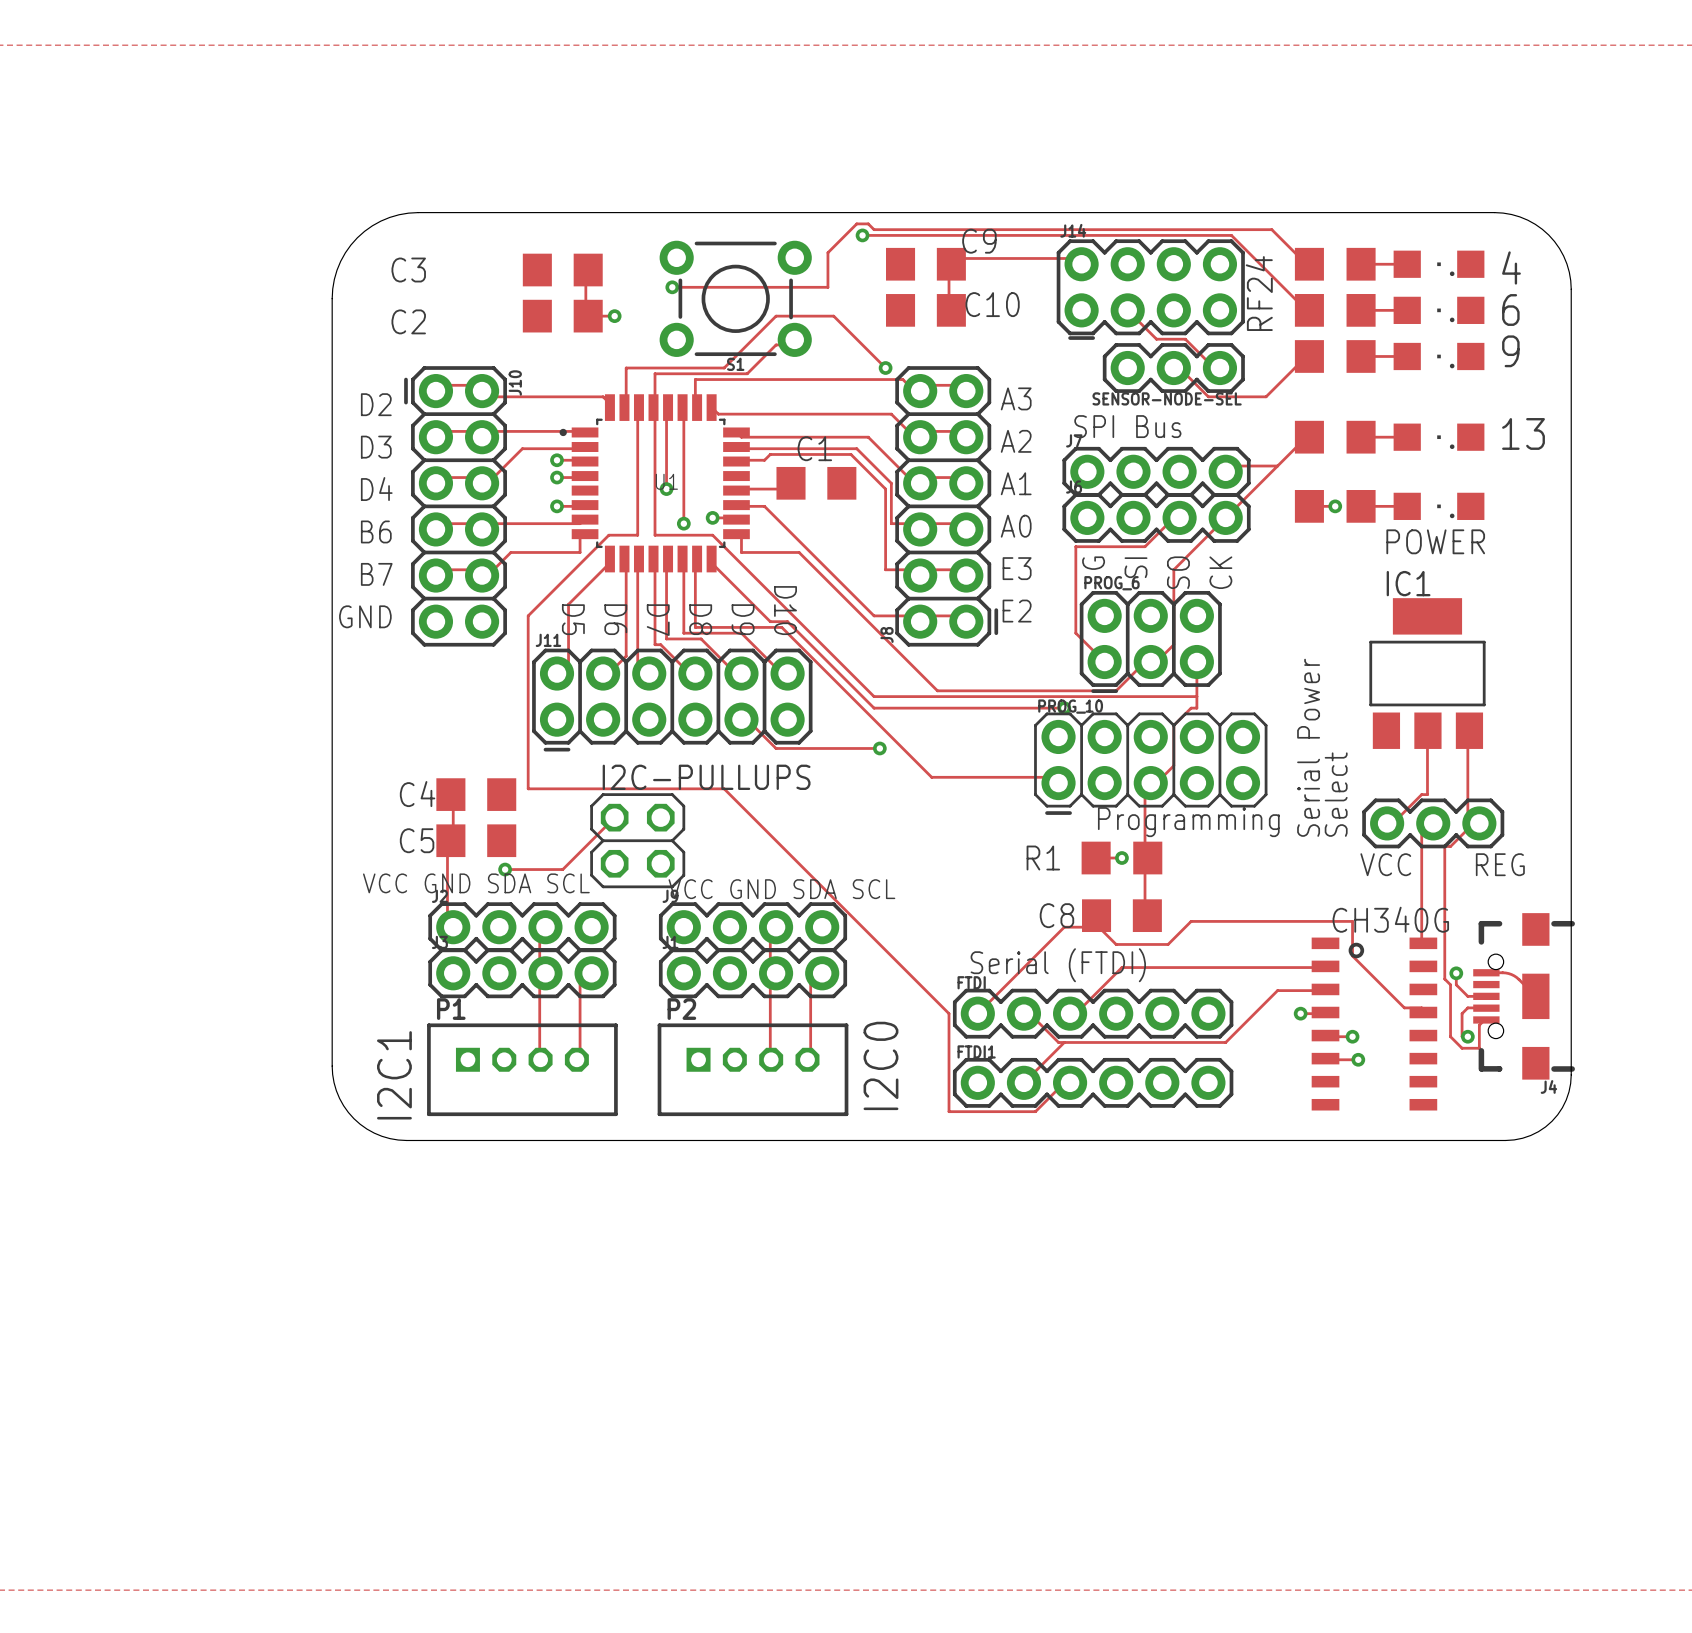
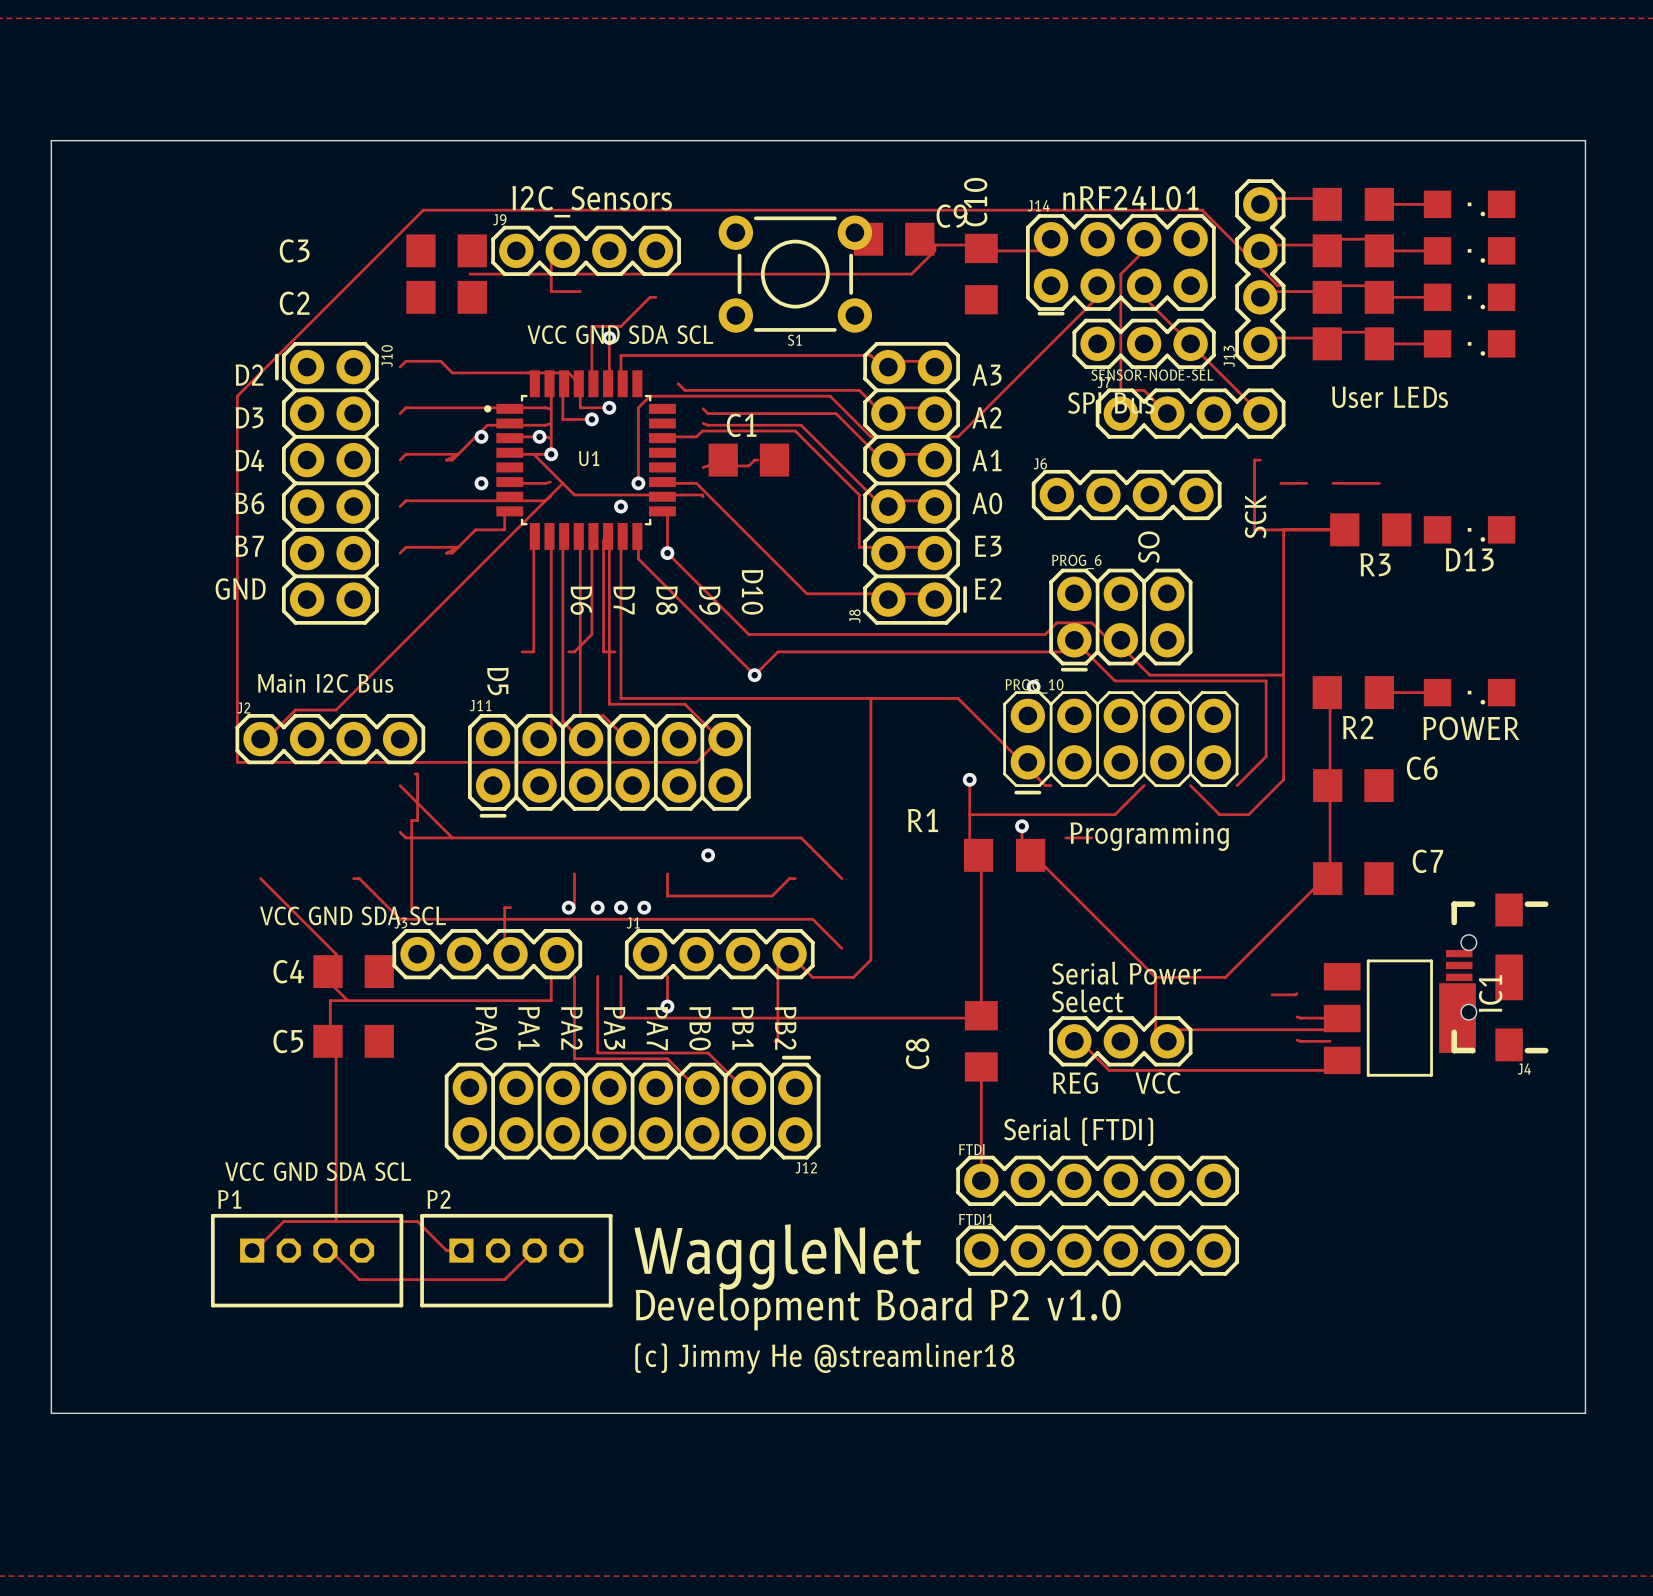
board edge: (418, 212) (1494, 212) (1519, 216) (1542, 229) (1554, 241) (1563, 256) (1569, 272) (1571, 289) (1571, 1074) (1569, 1091) (1557, 1114) (1538, 1131) (1522, 1138) (1505, 1140) (406, 1140) (381, 1136) (360, 1124) (348, 1112) (339, 1098) (334, 1082) (332, 1066) (332, 288) (337, 270) (345, 252) (364, 231) (389, 217) (418, 212) -> (51, 140) (51, 1413) (1585, 1413) (1585, 140) (51, 140)
text: none -> nRF24L01 (1130, 198)
text: none -> I2C_Sensors (592, 201)
track: none -> (1260, 204) (1266, 198) (1318, 198) (1324, 204) (1327, 204)
part: none -> (1353, 204)
track: none -> (1379, 204) (1437, 204)
part: none -> (1469, 204)
track: none -> (830, 210) (423, 210) (237, 396) (237, 762) (696, 762) (719, 739)
via: (862, 235) -> none
track: (1081, 264) (1075, 258) (960, 258) (954, 264) (949, 264) (949, 310) (951, 310) -> none
track: (1309, 264) (1306, 264) (1271, 229) (874, 229) (868, 223) (856, 223) (827, 252) (827, 287) (672, 287) -> none
part: (1335, 264) -> none
part: (1439, 264) -> none
text: 4 (1511, 267) -> none
C3 position: (562, 270) -> (446, 250)
track: none -> (1051, 250) (981, 250) (981, 245) (934, 245) (934, 250) (911, 274) (469, 274)
track: none -> (1144, 250) (1120, 274) (1120, 390) (1144, 390) (1167, 413)
track: none -> (1260, 250) (1266, 245) (1318, 245) (1324, 250) (1327, 250)
part: none -> (1353, 250)
track: none -> (1379, 250) (1437, 250)
part: none -> (1469, 250)
via: (672, 287) -> none
text: RF24 (1259, 293) -> none
S1 position: (735, 298) -> (795, 274)
J13: none -> (1260, 274)
C10 name position: C10 (992, 304) -> C10 (975, 202)
C10 rotation: 0° (925, 310) -> 90° clockwise (981, 274)
C10 position: (925, 310) -> (981, 274)
track: (1127, 310) (1156, 339) (1185, 339) (1214, 368) (1219, 368) -> none
part: (1335, 310) -> none
part: (1439, 310) -> none
text: 6 (1510, 310) -> none
C2 position: (562, 316) -> (446, 297)
via: (614, 316) -> none
track: none -> (1097, 297) (958, 436) (870, 436) (830, 396) (650, 396) (638, 407) (638, 483)
track: none -> (1144, 297) (1260, 413)
track: none -> (1260, 297) (1266, 291) (1318, 291) (1324, 297) (1327, 297)
part: none -> (1353, 297)
track: none -> (1379, 297) (1437, 297)
part: none -> (1469, 297)
track: (794, 339) (793, 344) (776, 344) (747, 373) (655, 373) (655, 379) -> none
text: 9 (1510, 351) -> none
track: (1309, 356) (1306, 356) (1266, 396) (1208, 396) (1179, 368) (1173, 368) -> none
part: (1335, 356) -> none
part: (1439, 356) -> none
text: none -> VCC GND SDA SCL (620, 334)
track: none -> (609, 338) (608, 383)
via: none -> (609, 338)
track: (626, 368) (724, 368) (776, 316) (833, 316) (885, 368) -> (591, 343) (591, 326) (620, 326) (650, 297) (655, 297)
via: (885, 368) -> none
track: none -> (1260, 343) (1266, 338) (1318, 338) (1324, 343) (1327, 343)
part: none -> (1353, 343)
track: none -> (1379, 343) (1437, 343)
part: none -> (1469, 343)
track: (695, 379) (697, 407) -> (661, 355) (620, 355)
track: (655, 402) (655, 535) (712, 535) (874, 696) (1179, 696) -> (662, 511) (667, 512) (667, 553) (748, 634) (1045, 634) (1056, 622) (1091, 622) (1115, 646) (1120, 646) (1149, 675)
text position: D2 (376, 404) -> D2 (249, 375)
track: none -> (549, 383) (551, 384) (551, 454)
track: none -> (564, 383) (562, 419) (591, 419)
track: none -> (578, 383) (580, 407) (609, 407)
track: (638, 407) (637, 535) (608, 535) (528, 615) (528, 788) (724, 788) (949, 1013) (949, 1111) (1035, 1111) (1064, 1082) (1070, 1082) -> none
track: (668, 407) (666, 489) -> none
track: (682, 407) (683, 523) -> none
text: none -> User LEDs (1389, 397)
via: none -> (609, 407)
text: 13 (1523, 433) -> none
track: (1309, 437) (1306, 437) (1173, 569) (1173, 644) (1156, 662) (1145, 662) (1116, 690) (937, 690) (799, 552) (741, 552) (741, 535) (736, 534) -> none
part: (1335, 437) -> none
track: (1361, 437) (1407, 437) -> none
part: (1439, 437) -> none
via: none -> (591, 419)
text position: D3 (376, 447) -> D3 (249, 417)
track: (833, 448) (856, 448) (891, 483) (891, 517) -> (795, 431) (859, 494)
track: none -> (801, 425) (882, 506) (888, 506) (876, 500)
track: (770, 454) (764, 460) (736, 461) -> (737, 431) (702, 431) (696, 436) (662, 438)
track: (827, 454) (851, 454) (885, 489) (885, 569) (891, 569) -> none
via: none -> (481, 436)
via: (557, 460) -> none
via: none -> (539, 436)
track: (1277, 466) (1231, 466) (1225, 471) -> none
J7 position: (1156, 471) -> (1190, 413)
via: (557, 477) -> none
track: none -> (533, 454) (574, 494) (661, 494) (662, 496) (679, 494)
via: none -> (551, 454)
U1 position: (654, 483) -> (579, 460)
C1 position: (816, 483) -> (748, 460)
track: none -> (1260, 460) (1254, 460) (1254, 529) (1344, 529)
text position: D4 (376, 489) -> D4 (249, 460)
via: (666, 489) -> none
track: (736, 505) (764, 506) (874, 615) -> (662, 482) (696, 483) (806, 593) (841, 593)
J10 position: (455, 506) -> (326, 483)
via: none -> (481, 483)
via: (557, 506) -> none
track: none -> (562, 483) (336, 710) (295, 710) (266, 739) (260, 739)
via: none -> (638, 483)
part: (1335, 506) -> none
via: (1335, 506) -> none
POWER position: (1439, 506) -> (1469, 692)
via: (712, 517) -> none
track: (1179, 517) (1173, 517) (1145, 546) (1075, 546) (1075, 633) (1104, 662) -> none
via: (683, 523) -> none
track: (891, 523) (908, 523) -> (859, 500) (859, 547)
via: none -> (620, 506)
text position: B6 (376, 531) -> B6 (249, 503)
track: (585, 534) (580, 535) (580, 552) (539, 552) -> (509, 511) (504, 512) (504, 529)
text: none -> SCK (1255, 516)
track: none -> (1283, 529) (1283, 779) (1248, 814) (1219, 814) (1190, 785)
R3: none -> (1370, 529)
D13: none -> (1469, 529)
track: none -> (549, 536) (551, 541) (551, 739) (539, 739)
track: none -> (564, 536) (562, 721) (580, 739) (586, 739)
track: (609, 559) (608, 564) (568, 604) -> (534, 536) (533, 582)
track: none -> (578, 536) (580, 715) (603, 715) (626, 739) (632, 739)
track: none -> (608, 536) (609, 704) (684, 704) (719, 739)
track: (668, 559) (666, 638) (701, 638) (735, 673) (741, 673) -> none
track: none -> (637, 536) (638, 558) (754, 675) (777, 651) (1085, 651) (1074, 646) (1080, 646) (1115, 680) (1266, 680) (1266, 756) (1237, 785)
track: (682, 559) (683, 633) (741, 633) (781, 673) (787, 673) -> none
track: (697, 559) (695, 564) (695, 627) (781, 627) (931, 777) (1052, 777) (1058, 783) -> none
track: (711, 559) (712, 564) (770, 621) (787, 621) (874, 708) (1064, 708) -> none
text: G (1093, 563) -> none
text: SI (1136, 567) -> none
text: CK (1220, 572) -> none
text position: B7 (376, 574) -> B7 (249, 546)
via: none -> (667, 553)
text position: GND (365, 616) -> GND (240, 589)
text position: D5 (573, 619) -> D5 (497, 681)
track: (655, 644) (660, 644) (689, 673) (695, 673) -> (620, 622) (620, 698) (708, 698)
track: (1196, 662) (1196, 708) (1191, 708) (1173, 725) (1173, 765) (1156, 783) (1145, 783) (1145, 915) (1147, 915) -> none
IC1 rotation: 0° (1427, 673) -> 90° clockwise (1399, 1018)
IC1 position: (1427, 673) -> (1399, 1018)
via: none -> (754, 675)
track: none -> (1167, 675) (1283, 675)
J11 position: (672, 700) -> (609, 765)
text: none -> Main I2C Bus (325, 683)
track: none -> (1327, 692) (1330, 692) (1330, 878) (1324, 878) (1225, 977) (1155, 977)
R2: none -> (1353, 692)
track: none -> (1379, 692) (1437, 692)
track: (747, 719) (776, 748) (879, 748) -> (713, 698) (958, 698) (1045, 785) (1051, 785)
track: none -> (870, 698) (870, 959) (853, 977) (812, 977) (789, 954) (795, 948)
track: (1427, 730) (1427, 794) (1421, 794) (1392, 823) (1387, 823) -> none
track: (1469, 730) (1467, 731) (1467, 823) (1479, 823) -> none
text rotation: 0° (1308, 747) -> 90° clockwise (1126, 973)
text position: Serial Power (1308, 747) -> Serial Power (1126, 973)
via: (879, 748) -> none
C4 position: (476, 794) -> (353, 971)
text rotation: 0° (1336, 794) -> 90° clockwise (1087, 1001)
text position: Select (1336, 794) -> Select (1087, 1001)
track: none -> (969, 779) (969, 855) (981, 855) (981, 1018) (620, 1018) (620, 976)
via: none -> (969, 779)
track: none -> (400, 785) (452, 837)
track: none -> (1144, 785) (1115, 814) (969, 814)
C6: none -> (1353, 785)
track: (614, 817) (562, 869) (505, 869) -> none
text position: Programming (1188, 822) -> Programming (1149, 836)
track: (1433, 823) (1421, 823) (1421, 938) (1423, 943) -> none
part position: (1433, 823) -> (1120, 1041)
track: (1473, 823) (1450, 846) (1444, 846) (1444, 979) (1450, 984) (1450, 1036) (1462, 1048) (1479, 1048) (1479, 1025) (1486, 1019) -> none
C5 position: (476, 840) -> (353, 1041)
I2C-PULLUPS: (637, 840) -> none
track: none -> (1022, 826) (1022, 855) (1033, 855) (1155, 977)
via: none -> (1022, 826)
track: none -> (400, 832) (405, 837) (801, 837) (841, 878)
R1 name position: R1 (1043, 858) -> R1 (923, 820)
R1 position: (1121, 858) -> (1004, 855)
via: (1121, 858) -> none
text: VCC REG (1442, 864) -> none
via: (505, 869) -> none
via: none -> (708, 855)
text position: VCC GND SDA SCL (476, 883) -> VCC GND SDA SCL (353, 915)
text: VCC GND SDA SCL (781, 889) -> none
track: none -> (574, 873) (574, 907) (568, 907)
track: none -> (667, 873) (667, 896) (772, 896) (789, 878) (795, 878)
track: none -> (260, 878) (336, 954) (336, 971) (327, 971)
track: none -> (353, 878) (359, 878) (400, 919) (812, 919) (841, 948)
C7: none -> (1353, 878)
C8 rotation: 0° (1121, 915) -> 90° clockwise (981, 1041)
C8 position: (1121, 915) -> (981, 1041)
J2 position: (522, 927) -> (330, 739)
via: none -> (568, 907)
via: none -> (597, 907)
via: none -> (620, 907)
via: none -> (644, 907)
J9 position: (753, 927) -> (586, 250)
track: (776, 927) (770, 927) (771, 1059) -> none
track: (1098, 927) (1064, 927) (977, 1013) -> none
track: (1098, 927) (1116, 944) (1168, 944) (1191, 921) (1352, 921) (1352, 956) (1404, 1007) (1421, 1007) (1423, 1012) -> none
text position: Serial (FTDI) (1058, 965) -> Serial (FTDI) (1078, 1131)
track: (1325, 966) (1121, 967) (1075, 1013) (1070, 1013) -> none
track: (1486, 972) (1511, 974) (1535, 996) -> none
track: (545, 973) (539, 973) (540, 1059) -> none
track: (591, 973) (580, 973) (580, 1059) (576, 1059) -> none
track: (1456, 973) (1456, 984) (1467, 996) (1486, 996) -> none
via: (1456, 973) -> none
track: (1325, 989) (1277, 990) (1225, 1042) (1058, 1042) (1029, 1013) (1023, 1013) -> none
track: none -> (330, 971) (330, 983) (347, 1000)
track: none -> (551, 976) (551, 1000) (330, 1000) (330, 1041)
track: none -> (574, 976) (574, 1058) (667, 1058) (696, 1087) (702, 1087)
track: none -> (597, 976) (597, 1052) (708, 1052) (743, 1087) (748, 1087)
track: none -> (667, 976) (667, 1006)
track: none -> (1155, 977) (1155, 1041) (1167, 1041) (1155, 1029) (1335, 1029) (1341, 1023) (1342, 1018)
track: (1486, 1008) (1467, 1007) (1462, 1013) (1462, 1036) (1467, 1036) -> none
FTDI position: (1093, 1013) -> (1097, 1180)
via: (1300, 1013) -> none
part: (1374, 1024) -> none
via: none -> (667, 1006)
via: (1352, 1036) -> none
via: (1467, 1036) -> none
text: none -> PB0 (700, 1028)
text: none -> PB1 (743, 1028)
text: none -> PB2 (785, 1028)
track: (1064, 1042) (1023, 1082) -> none
text: none -> PA0 (486, 1028)
text: none -> PA1 (529, 1028)
text: none -> PA2 (571, 1028)
text: none -> PA3 (614, 1028)
text: none -> PA7 (657, 1028)
track: none -> (327, 1041) (336, 1041) (336, 1221)
track: none -> (1074, 1041) (1080, 1041) (1109, 1070) (1335, 1070) (1341, 1064) (1342, 1060)
via: (1358, 1059) -> none
text: I2C0 (880, 1065) -> none
P1 position: (522, 1069) -> (307, 1260)
P2 position: (753, 1069) -> (516, 1260)
text: I2C1 (394, 1075) -> none
FTDI1 position: (1093, 1082) -> (1097, 1250)
track: none -> (981, 1066) (981, 1180)
text: none -> REG VCC (1116, 1083)
J12: none -> (632, 1107)
text: none -> VCC GND SDA SCL (318, 1171)
track: none -> (252, 1250) (254, 1250) (283, 1221) (417, 1221) (446, 1250) (461, 1250)
track: none -> (325, 1250) (330, 1250) (359, 1279) (504, 1279) (534, 1250)
text: none -> WaggleNet (777, 1256)
text: none -> Development Board P2 v1.0 (878, 1309)
text: none -> (c) Jimmy He @streamliner18 (824, 1358)

